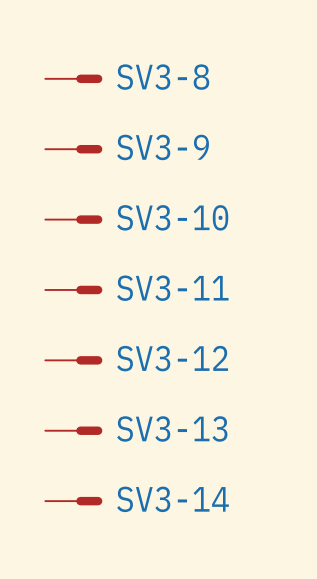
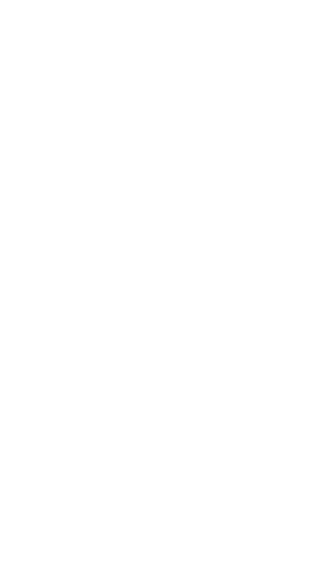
SV3-8: (73, 78) -> none
SV3-9: (73, 149) -> none
SV3-10: (73, 219) -> none
SV3-11: (73, 289) -> none
SV3-12: (73, 360) -> none
SV3-13: (73, 430) -> none
SV3-14: (73, 501) -> none

